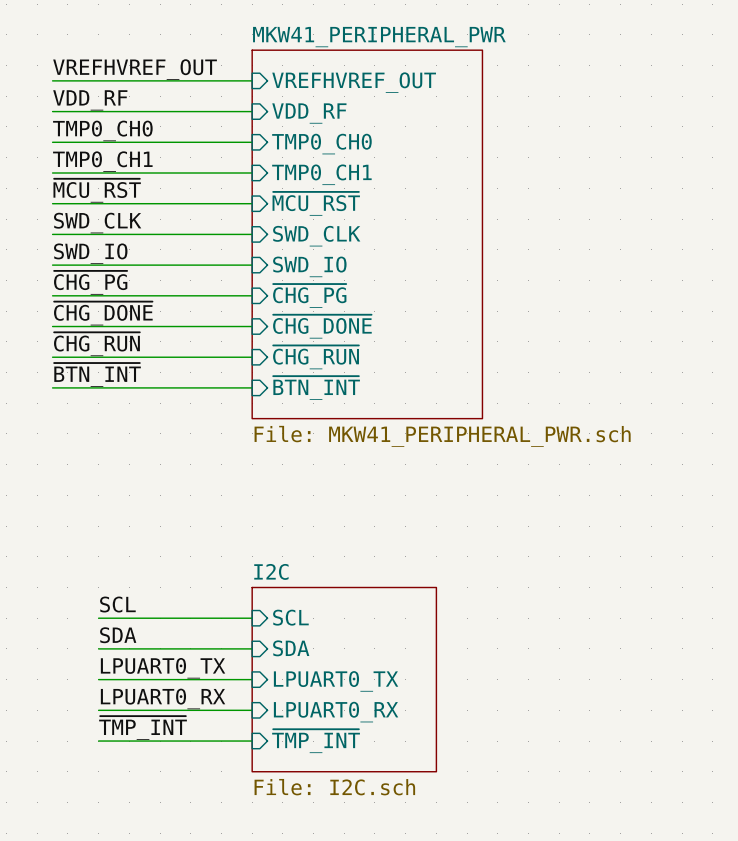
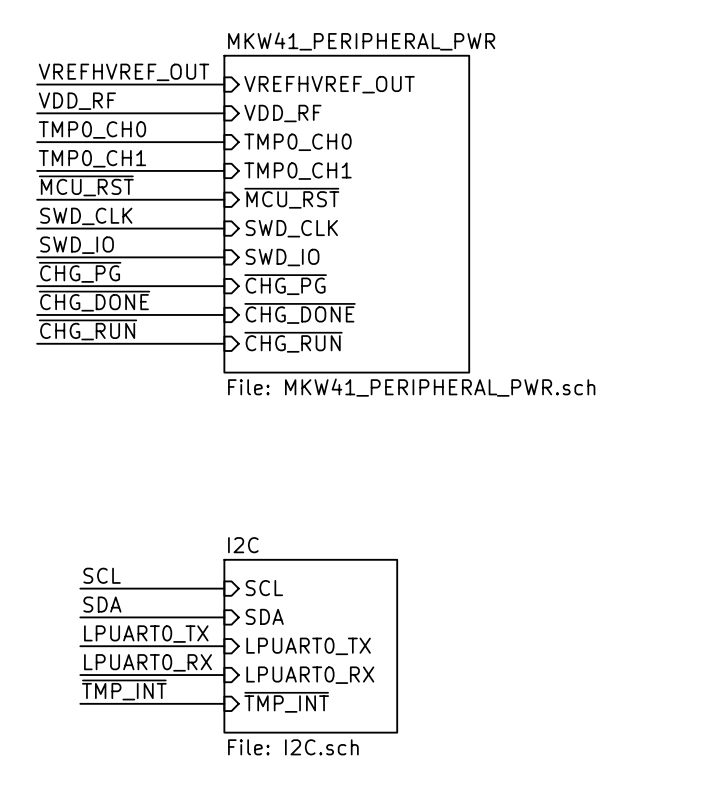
sheet MKW41_PERIPHERAL_PWR shape: [252, 50, 483, 419] -> [224, 55, 470, 373]
label: ~{BTN_INT} (97, 374) -> none
wire: (52, 387) (252, 387) -> none
sheet pin: ~{BTN_INT} (316, 388) -> none

